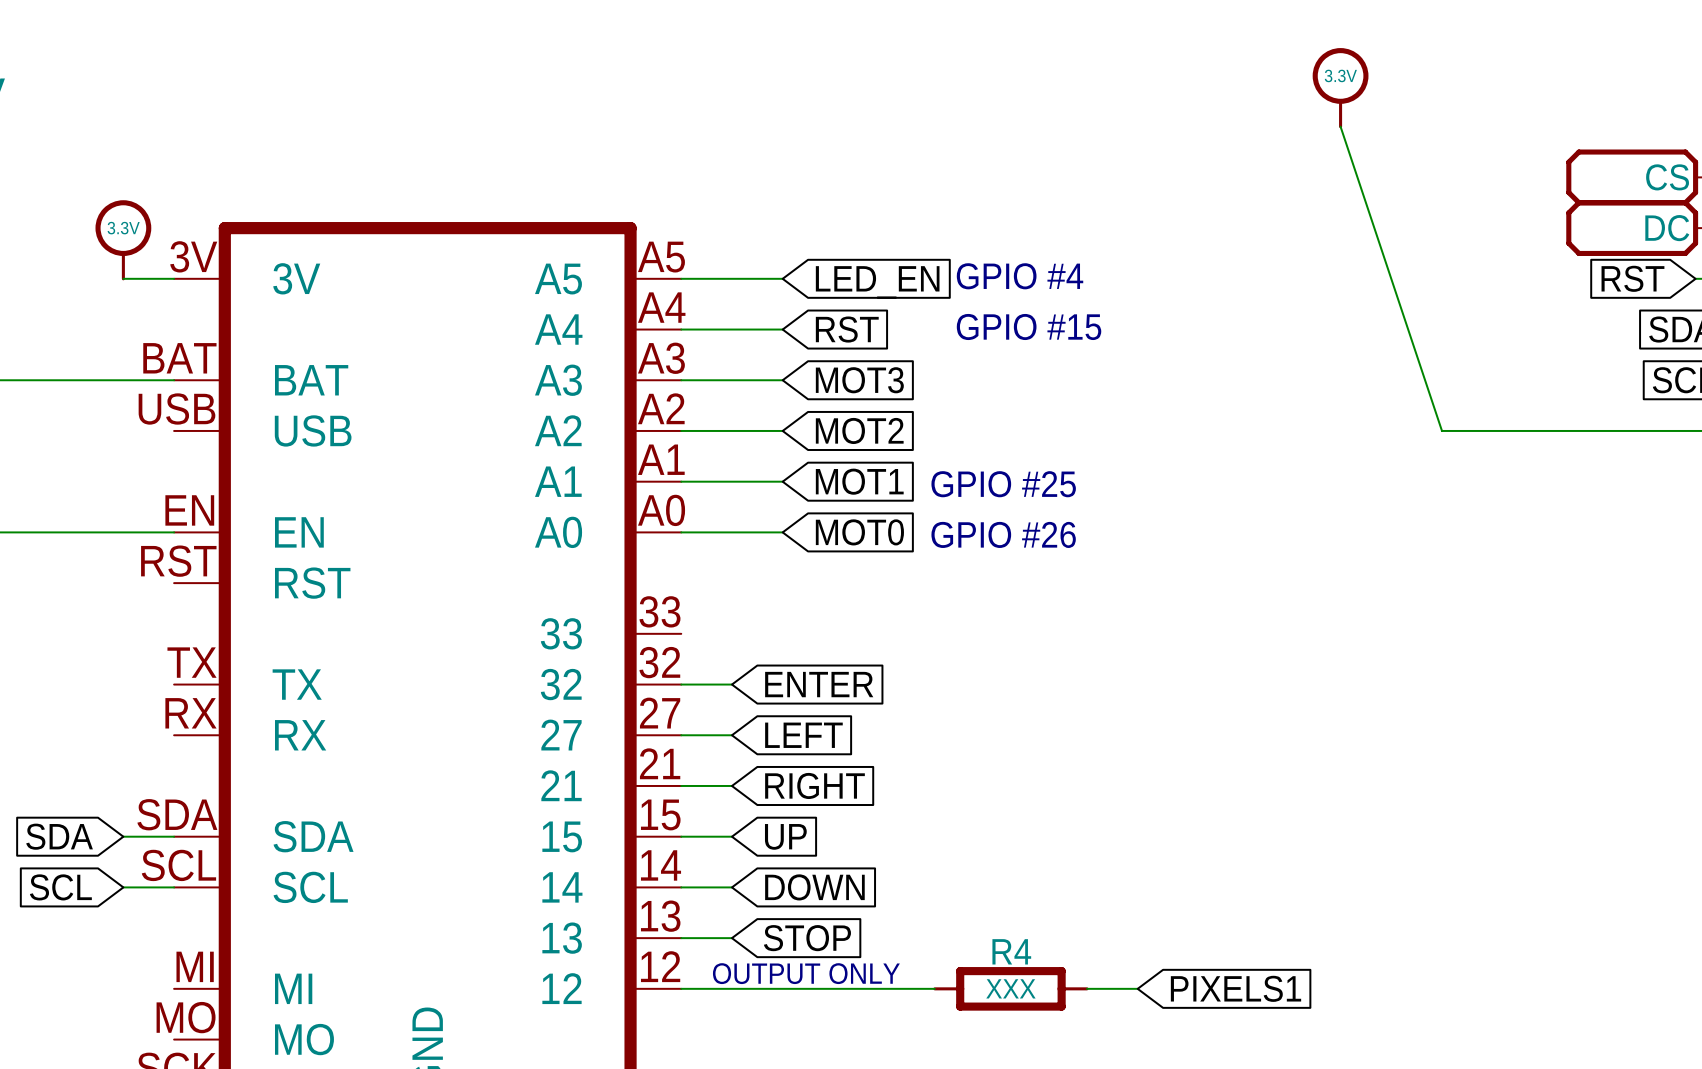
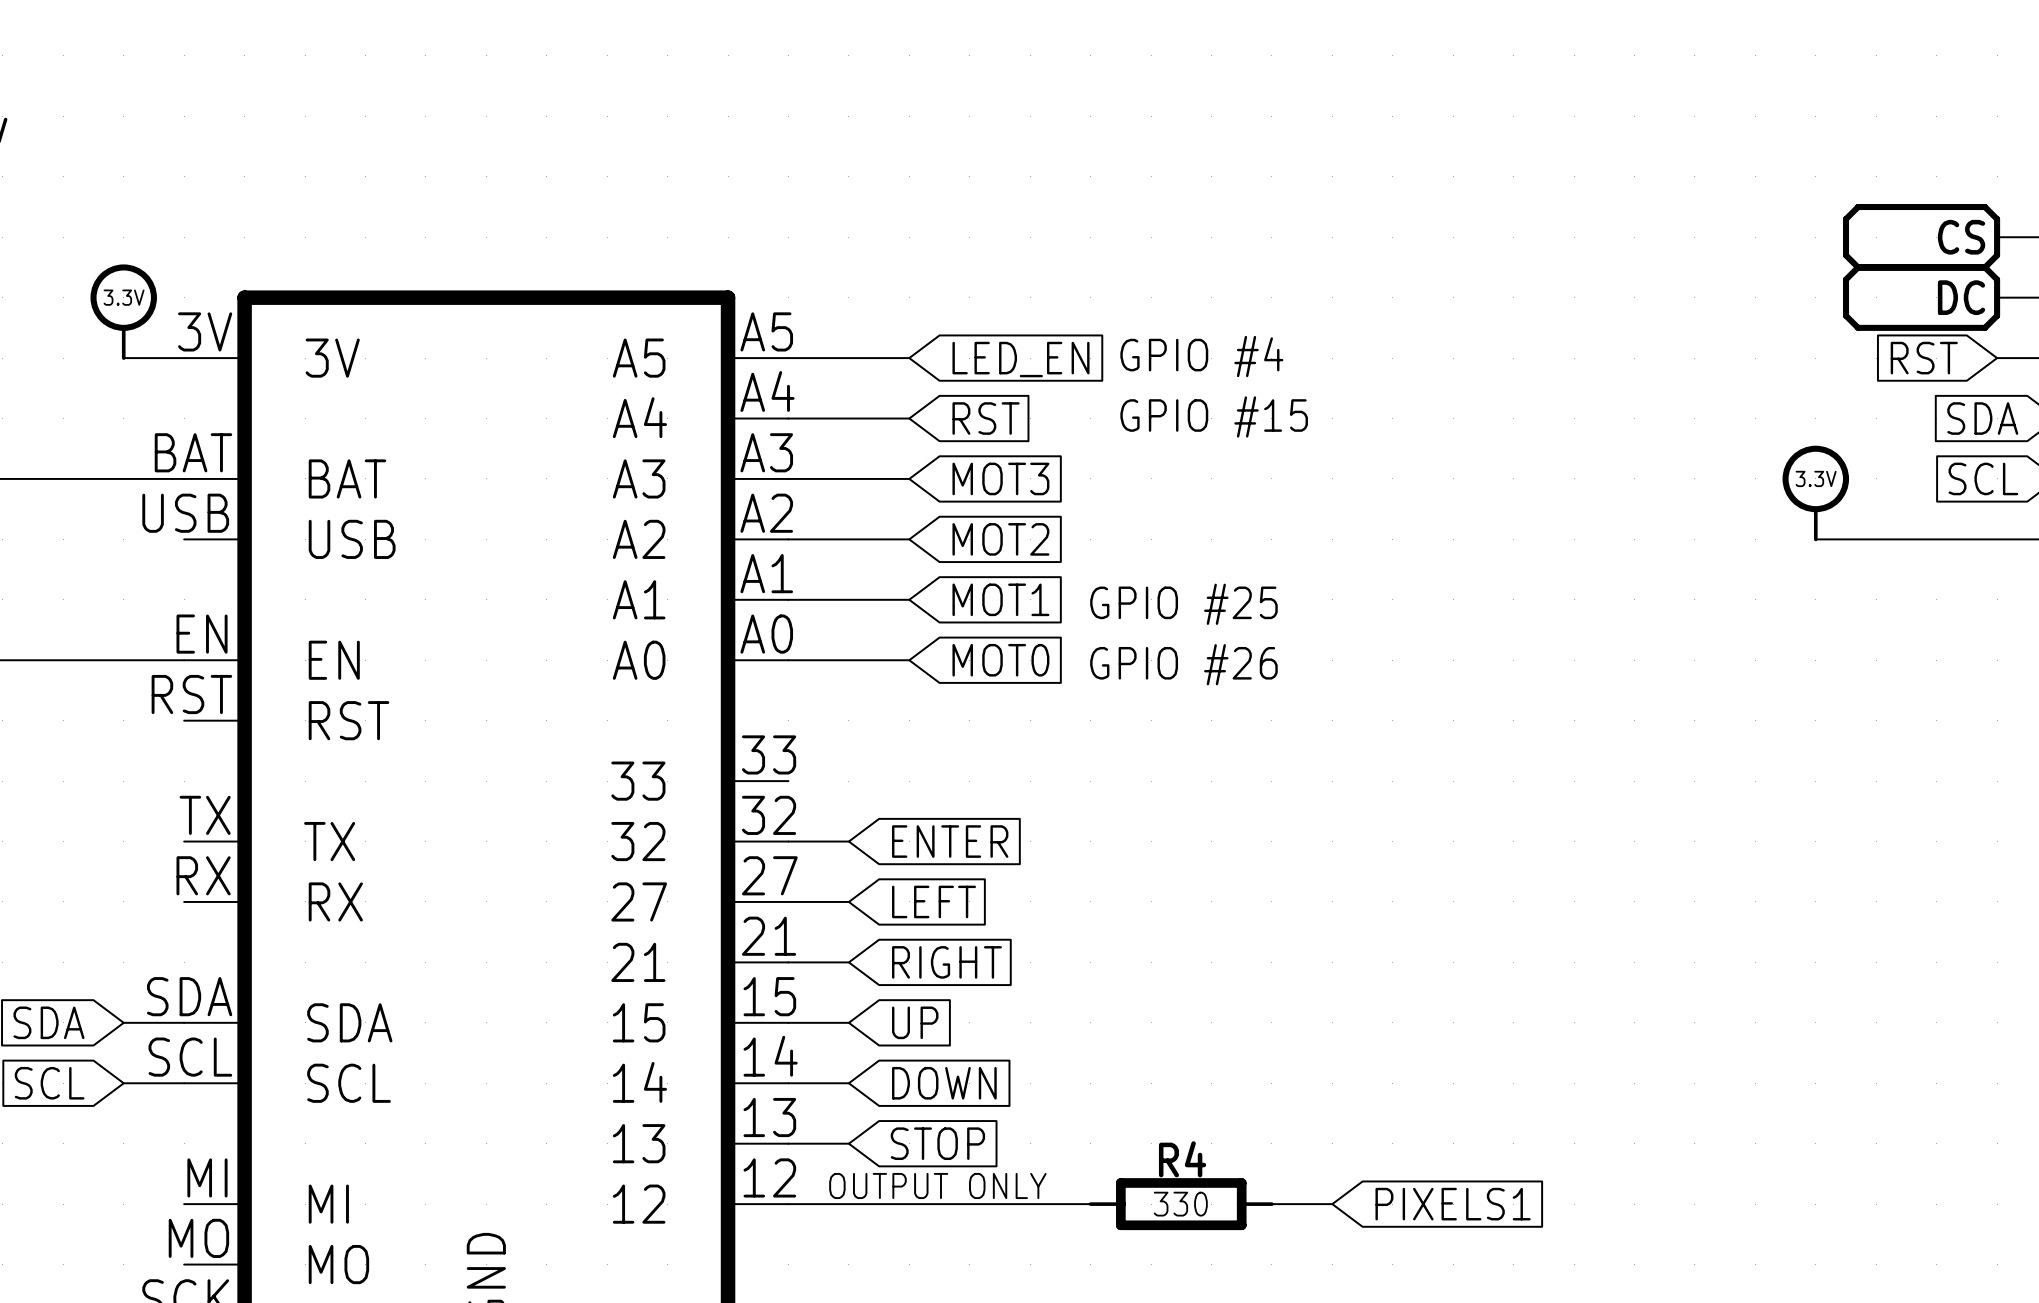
power symbol position: 3.3V (1340, 88) -> 3.3V (1815, 493)
wire: (1340, 126) (1442, 430) (1543, 430) -> none
R4 value: XXX (1010, 988) -> 330 (1180, 1204)

